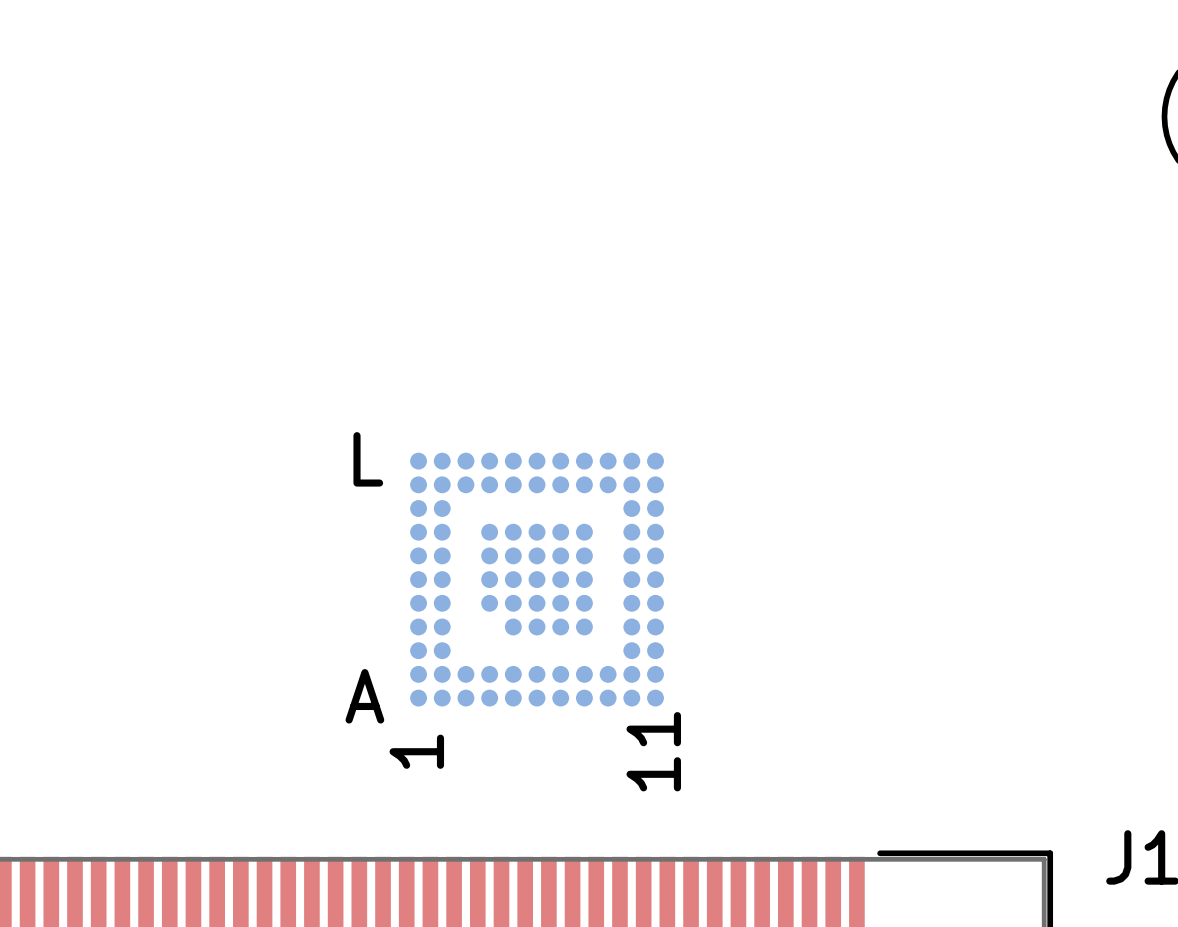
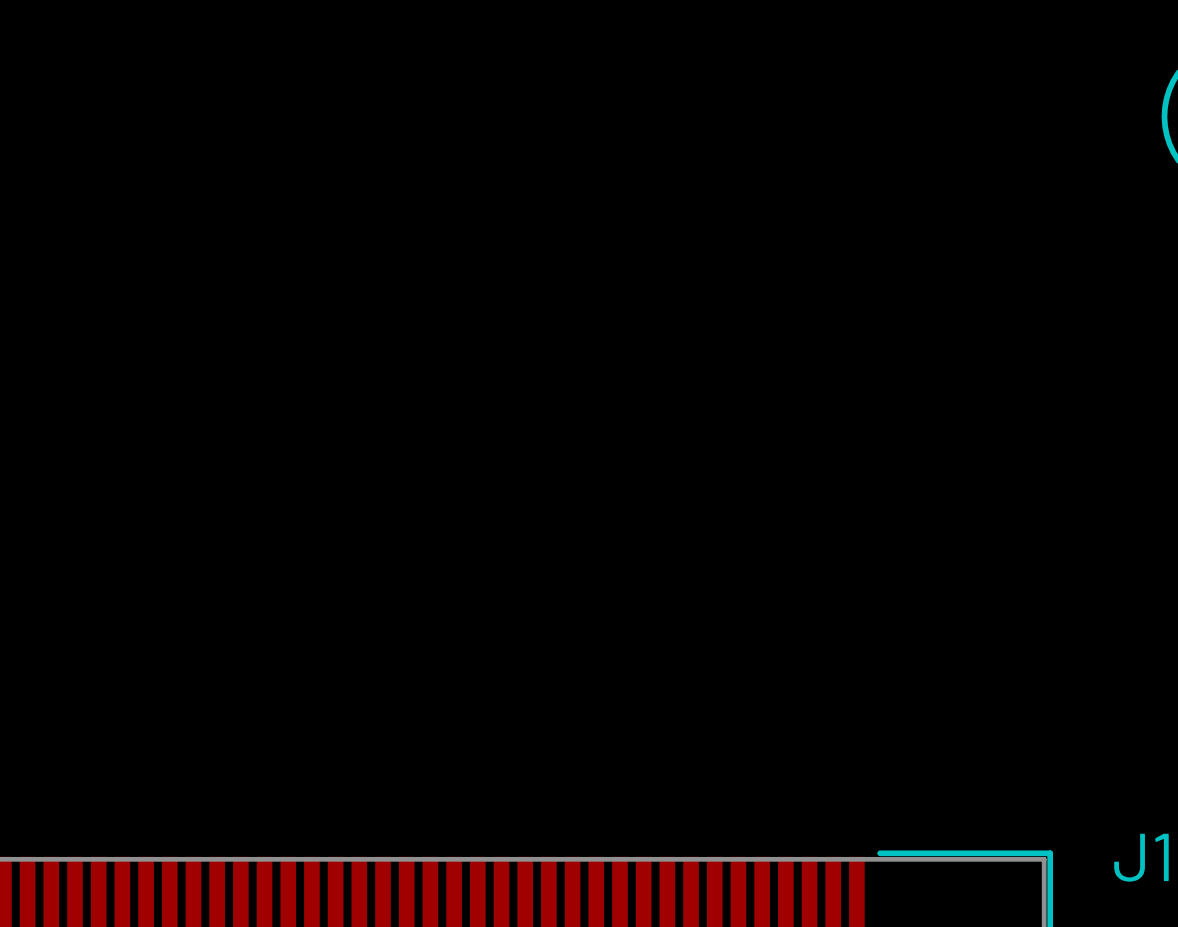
part: (537, 579) -> none

